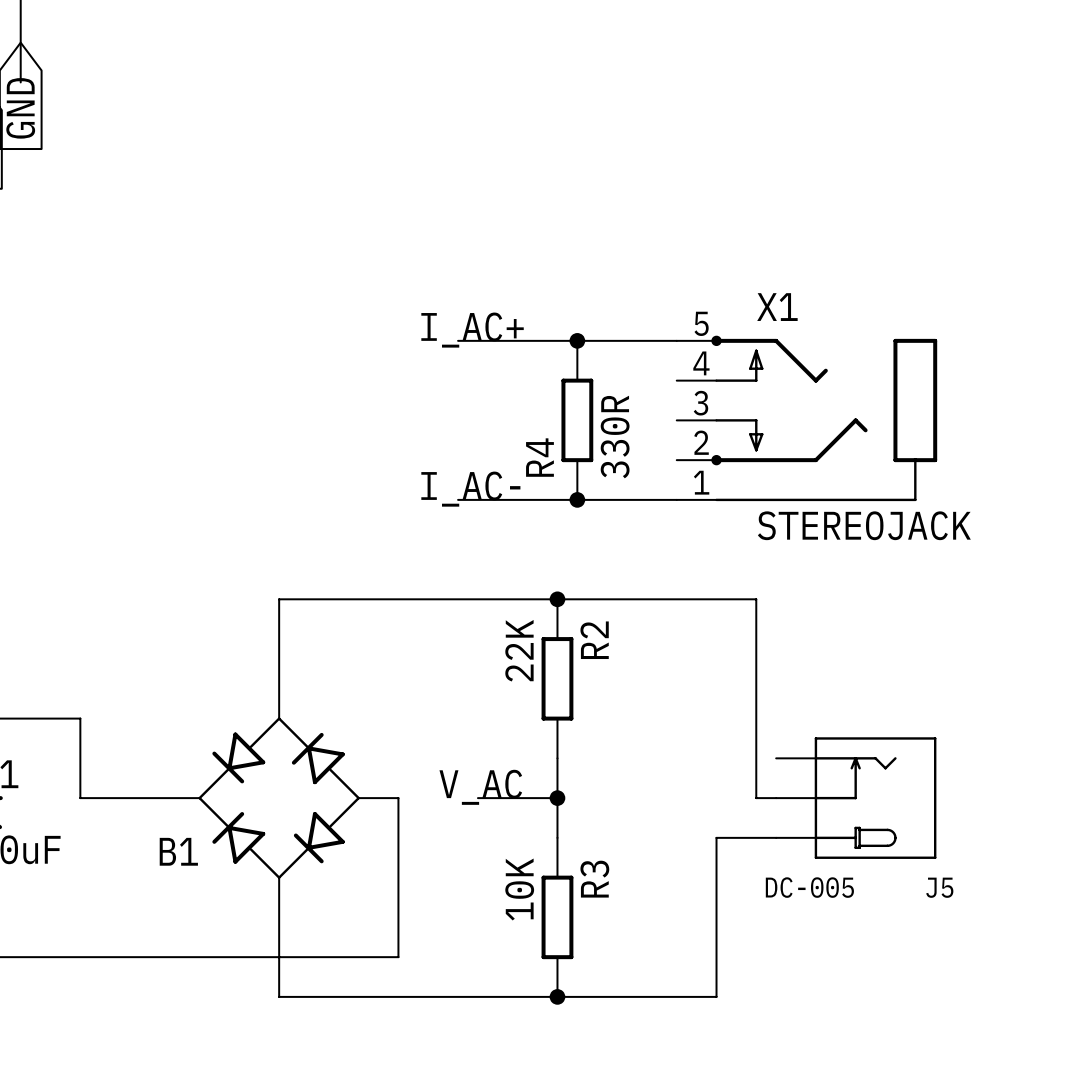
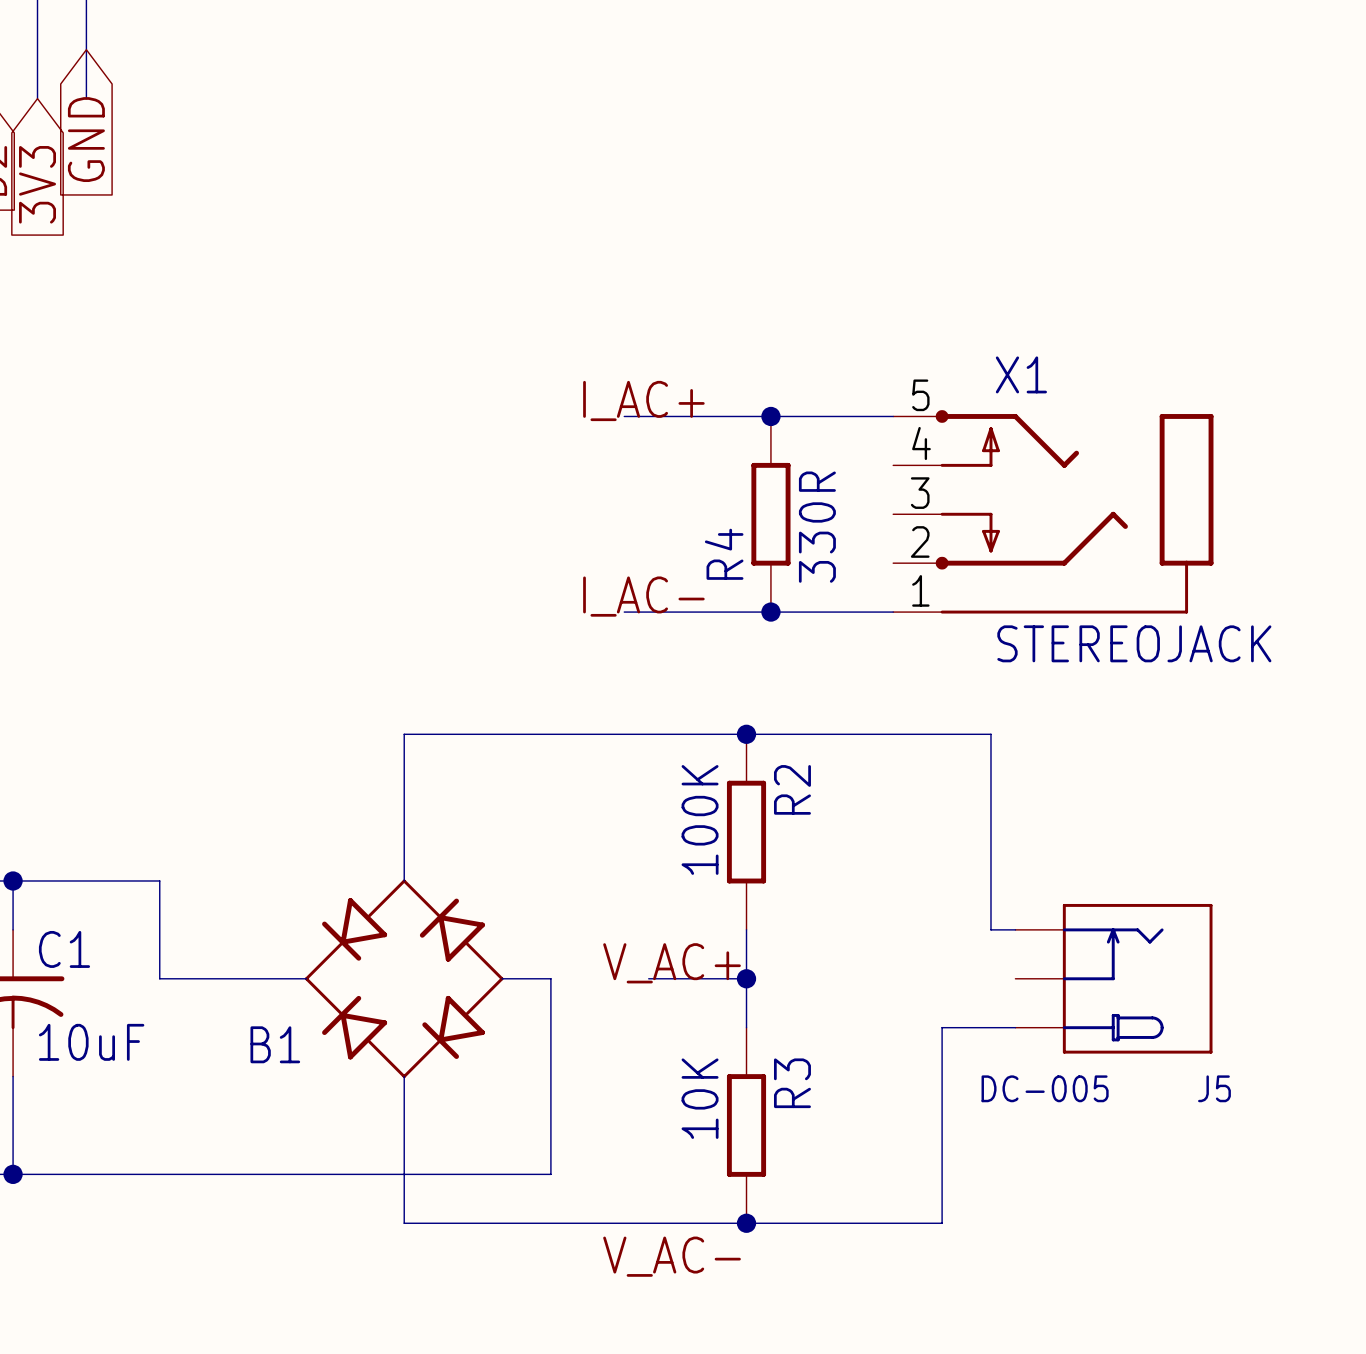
R2 value: 22K (519, 650) -> 100K (700, 819)
wire: (756, 758) (756, 798) (776, 798) -> (990, 929) (1015, 929)
label: V_AC (480, 787) -> V_AC+ (672, 963)
label: none -> V_AC- (672, 1256)

